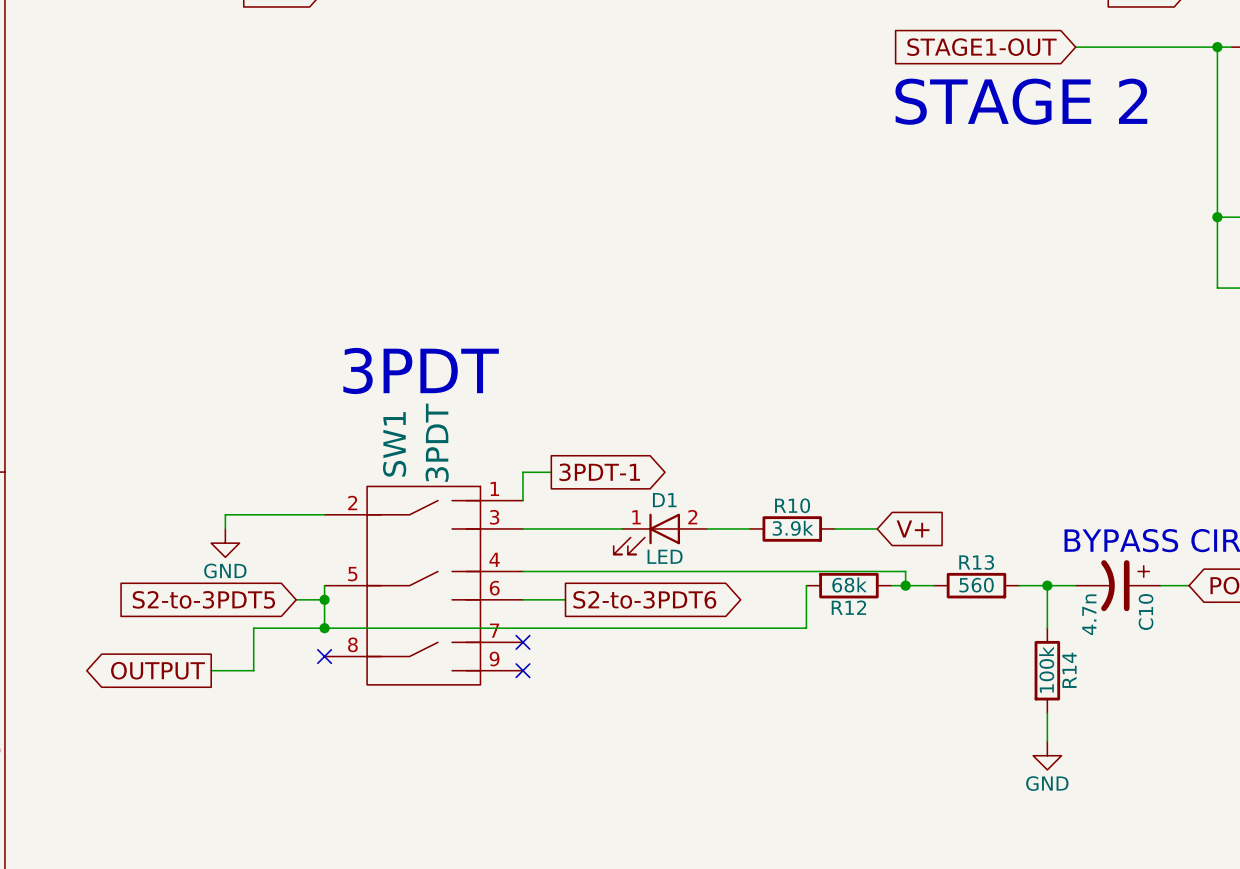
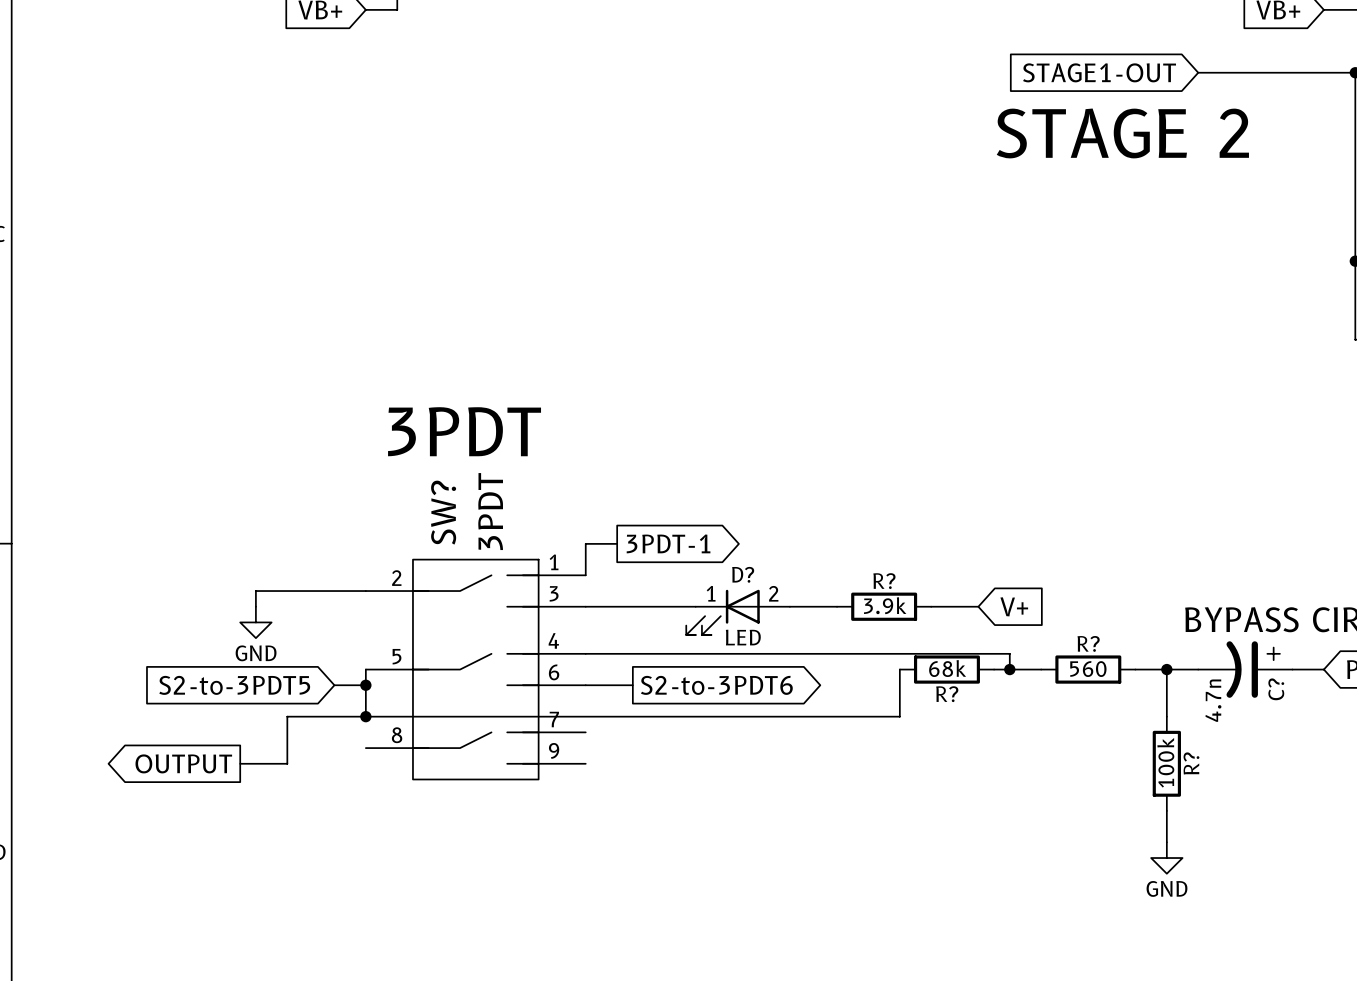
SW1 name: SW1 (394, 444) -> SW? (443, 512)
D1 name: D1 (664, 500) -> D? (743, 574)
R10 name: R10 (792, 505) -> R? (884, 581)
R13 name: R13 (976, 562) -> R? (1088, 643)
R12 name: R12 (848, 607) -> R? (947, 694)
C10 name: C10 (1146, 612) -> C? (1276, 689)
no-connect mark: (522, 642) -> none
no-connect mark: (324, 656) -> none
no-connect mark: (522, 670) -> none
R14 name: R14 (1069, 670) -> R? (1191, 763)

